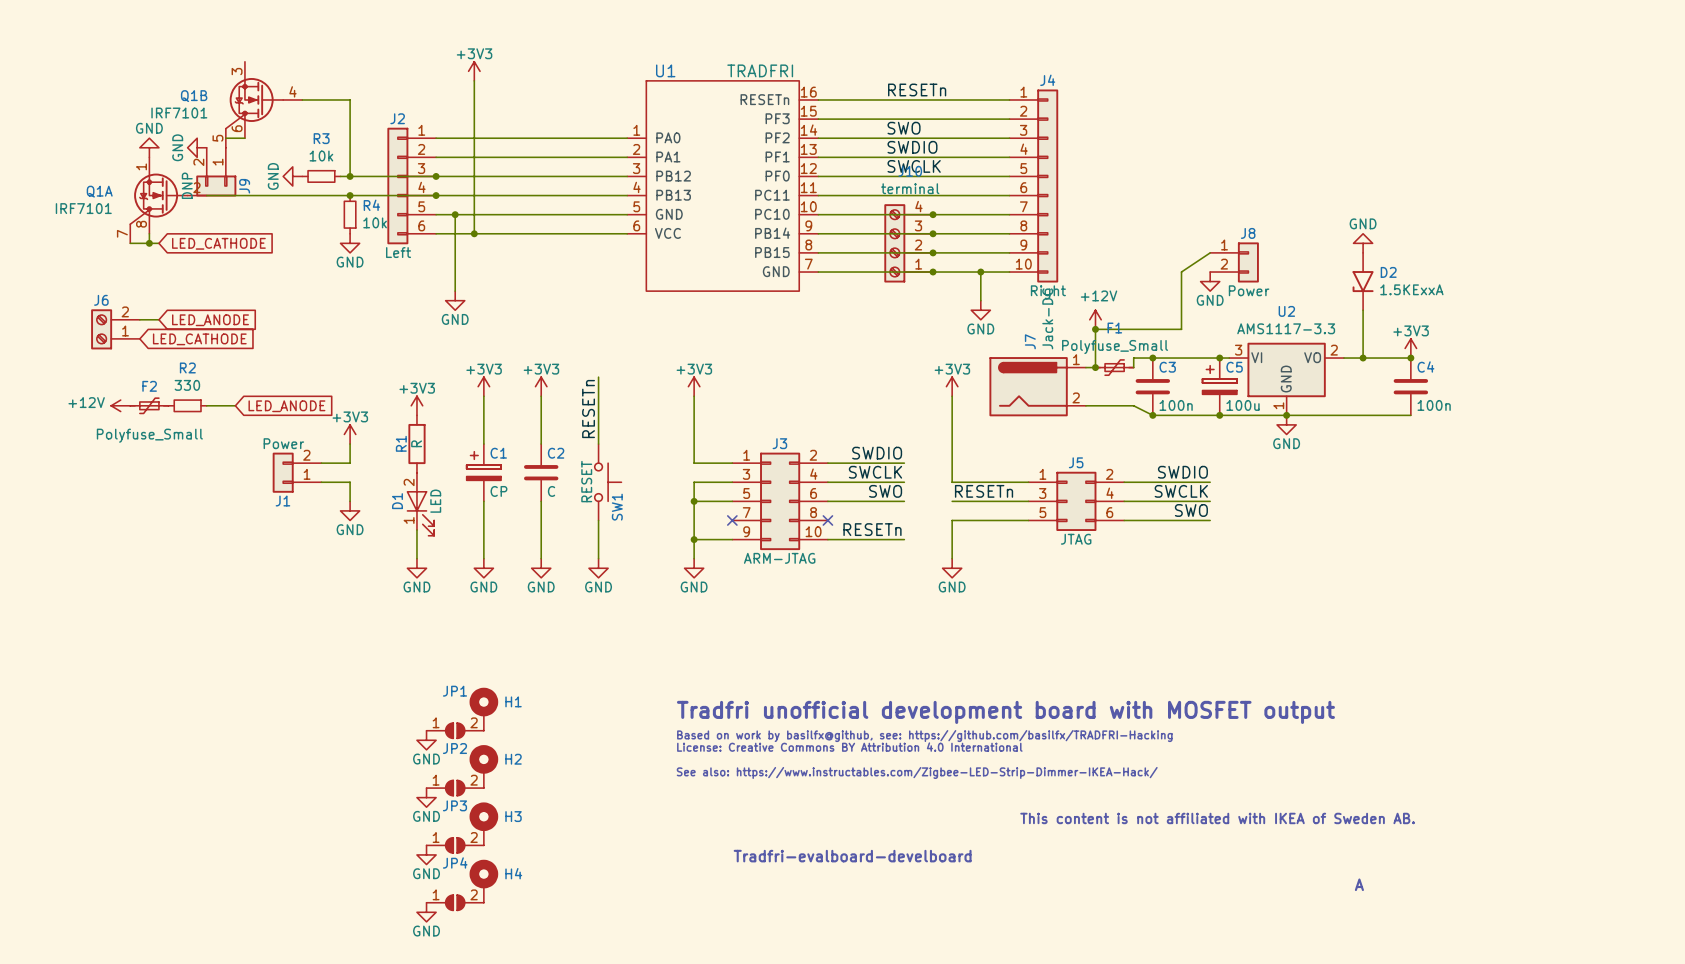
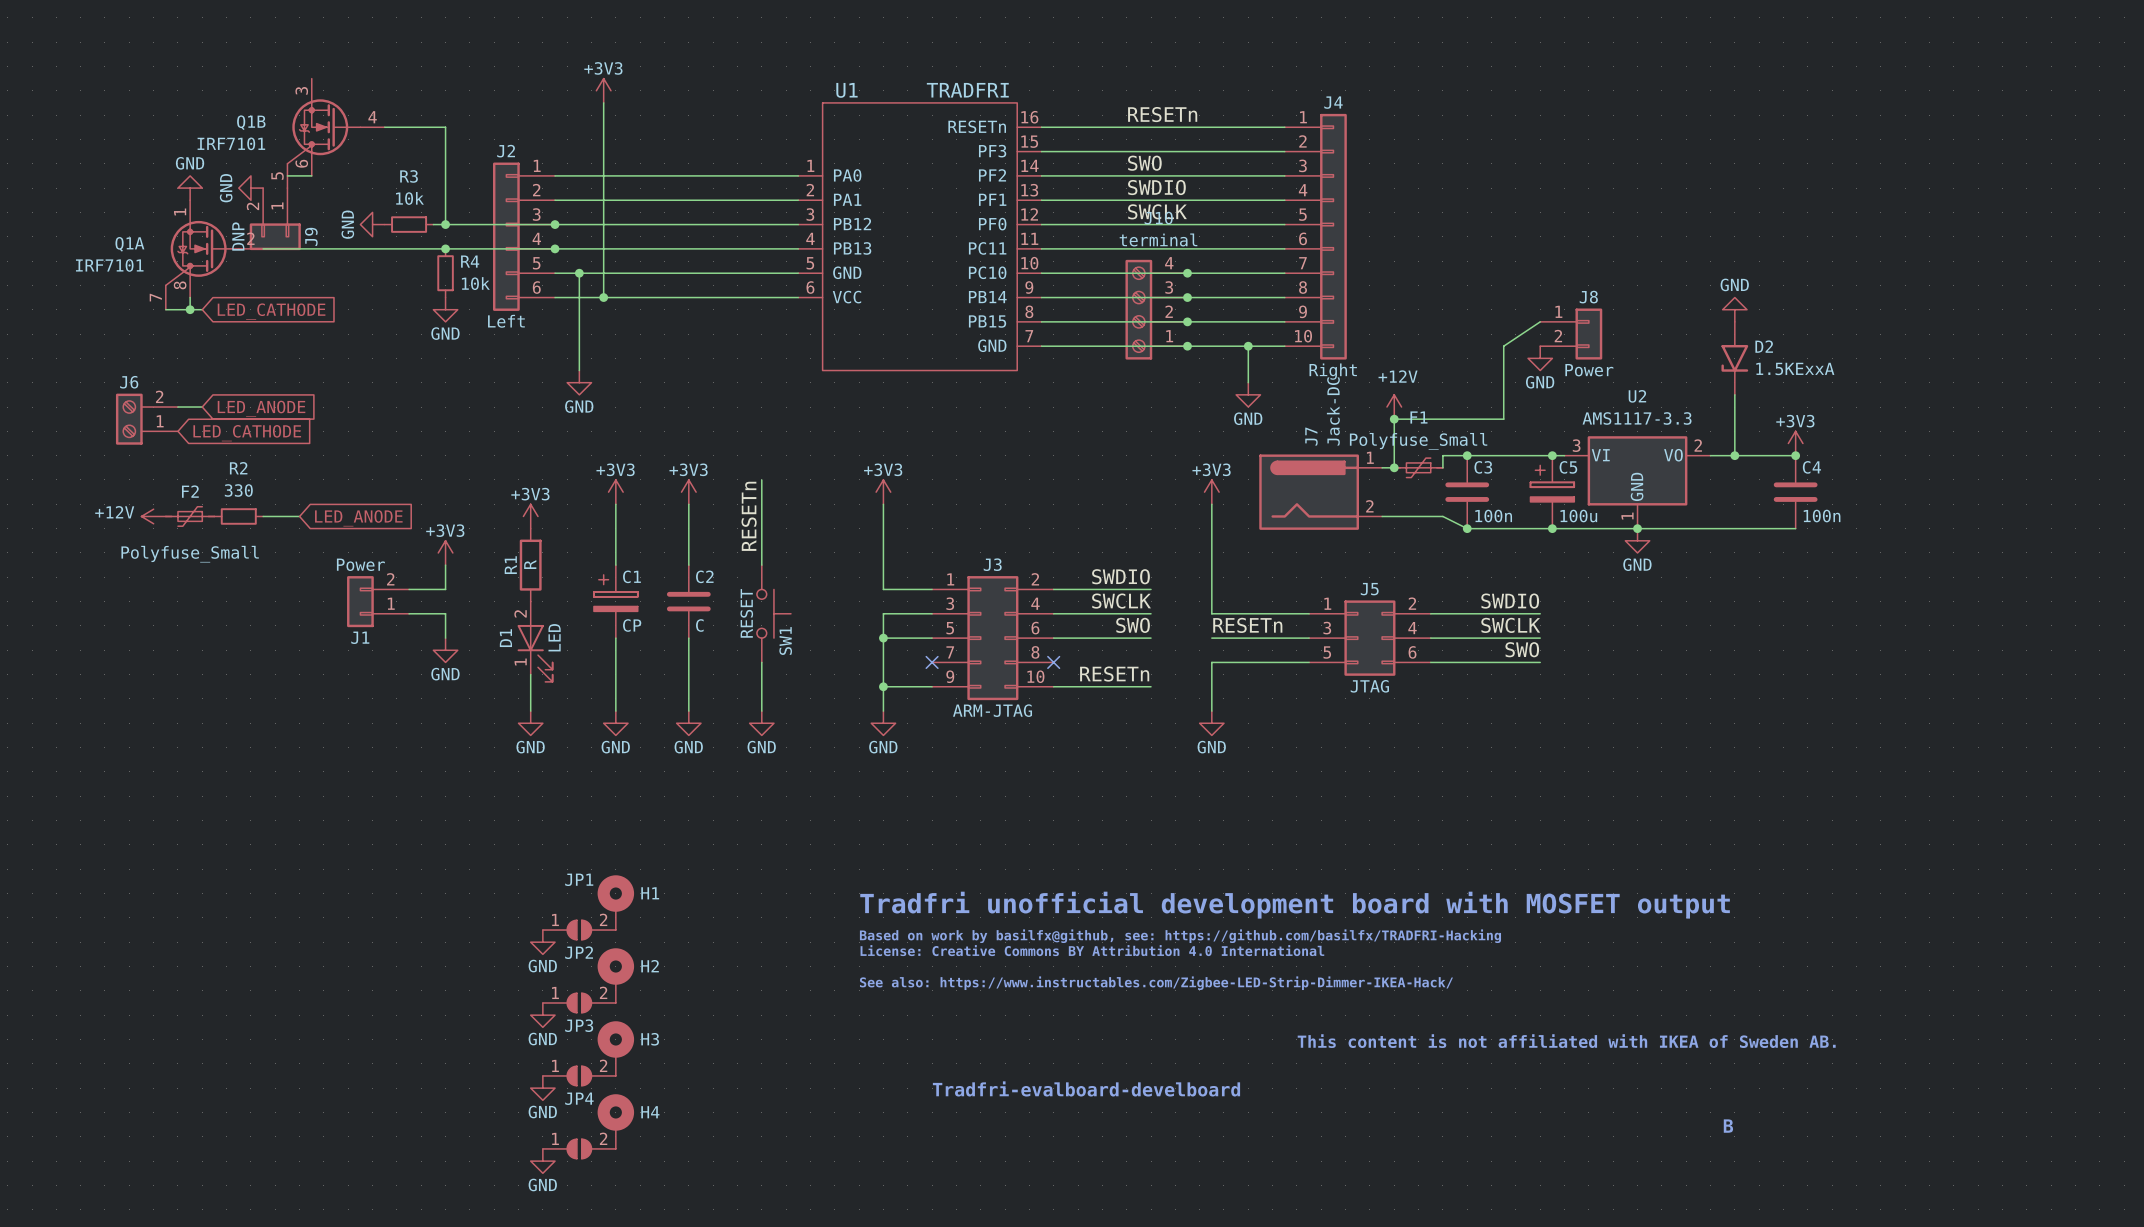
text: A (1359, 884) -> B (1728, 1126)

